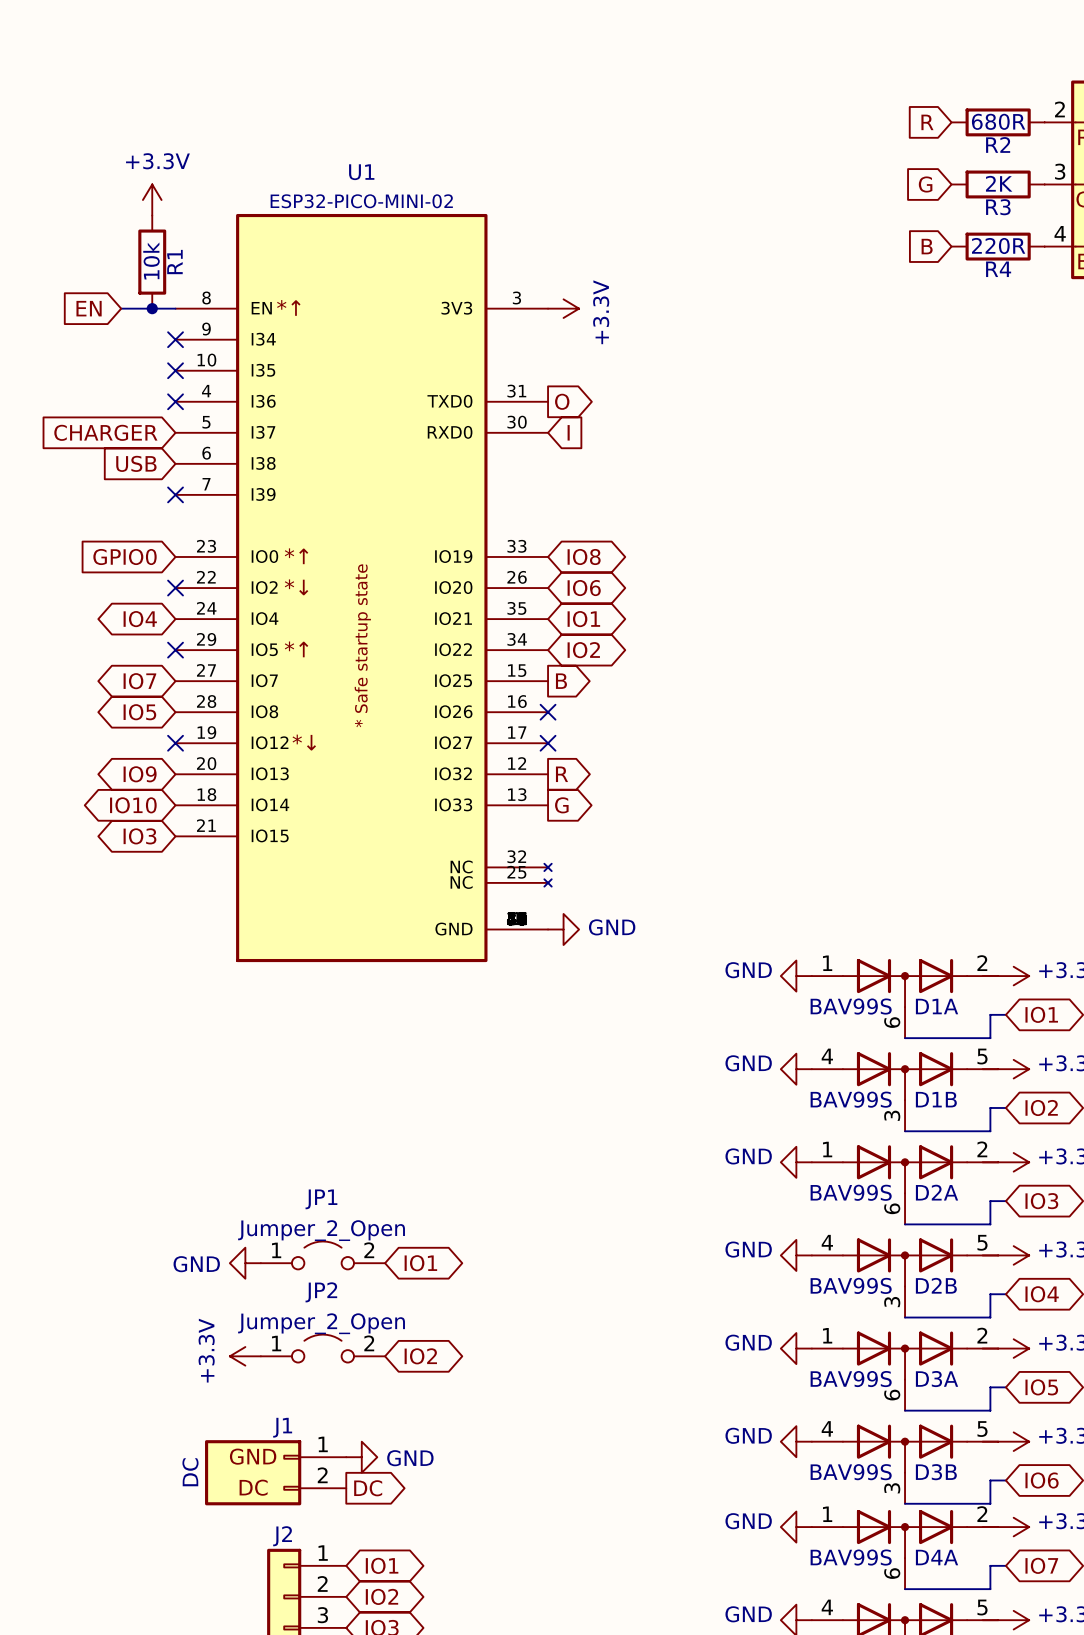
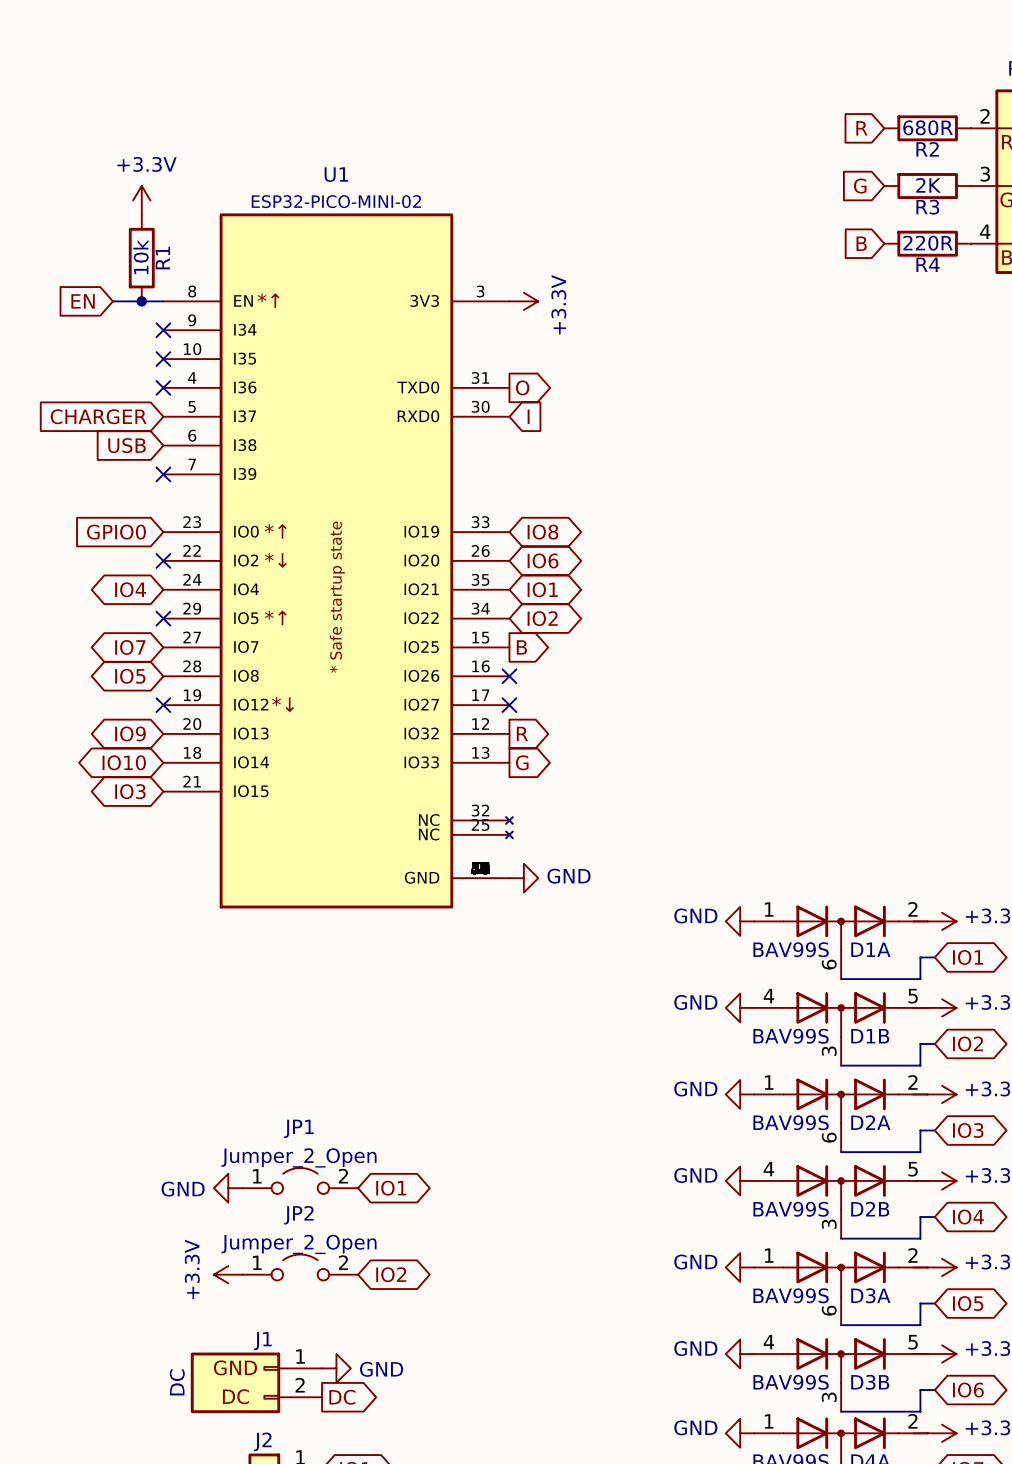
U1 text position: * Safe startup state (362, 645) -> * Safe startup state (337, 597)

